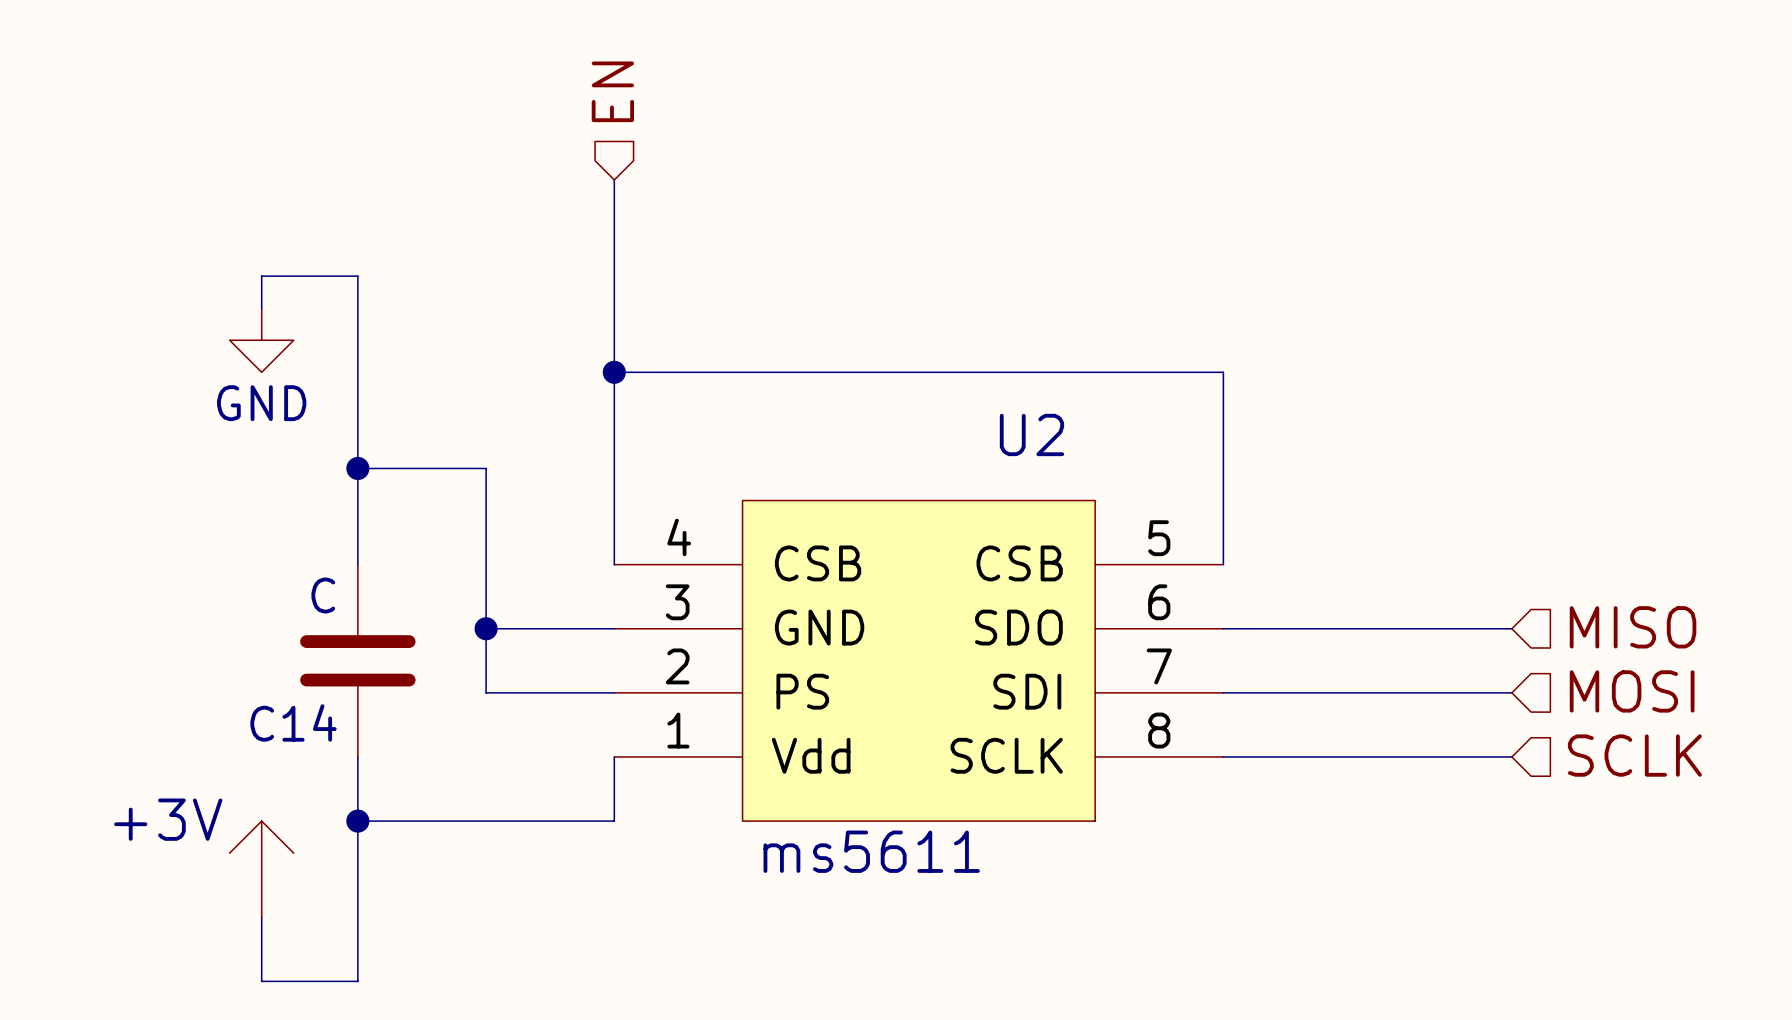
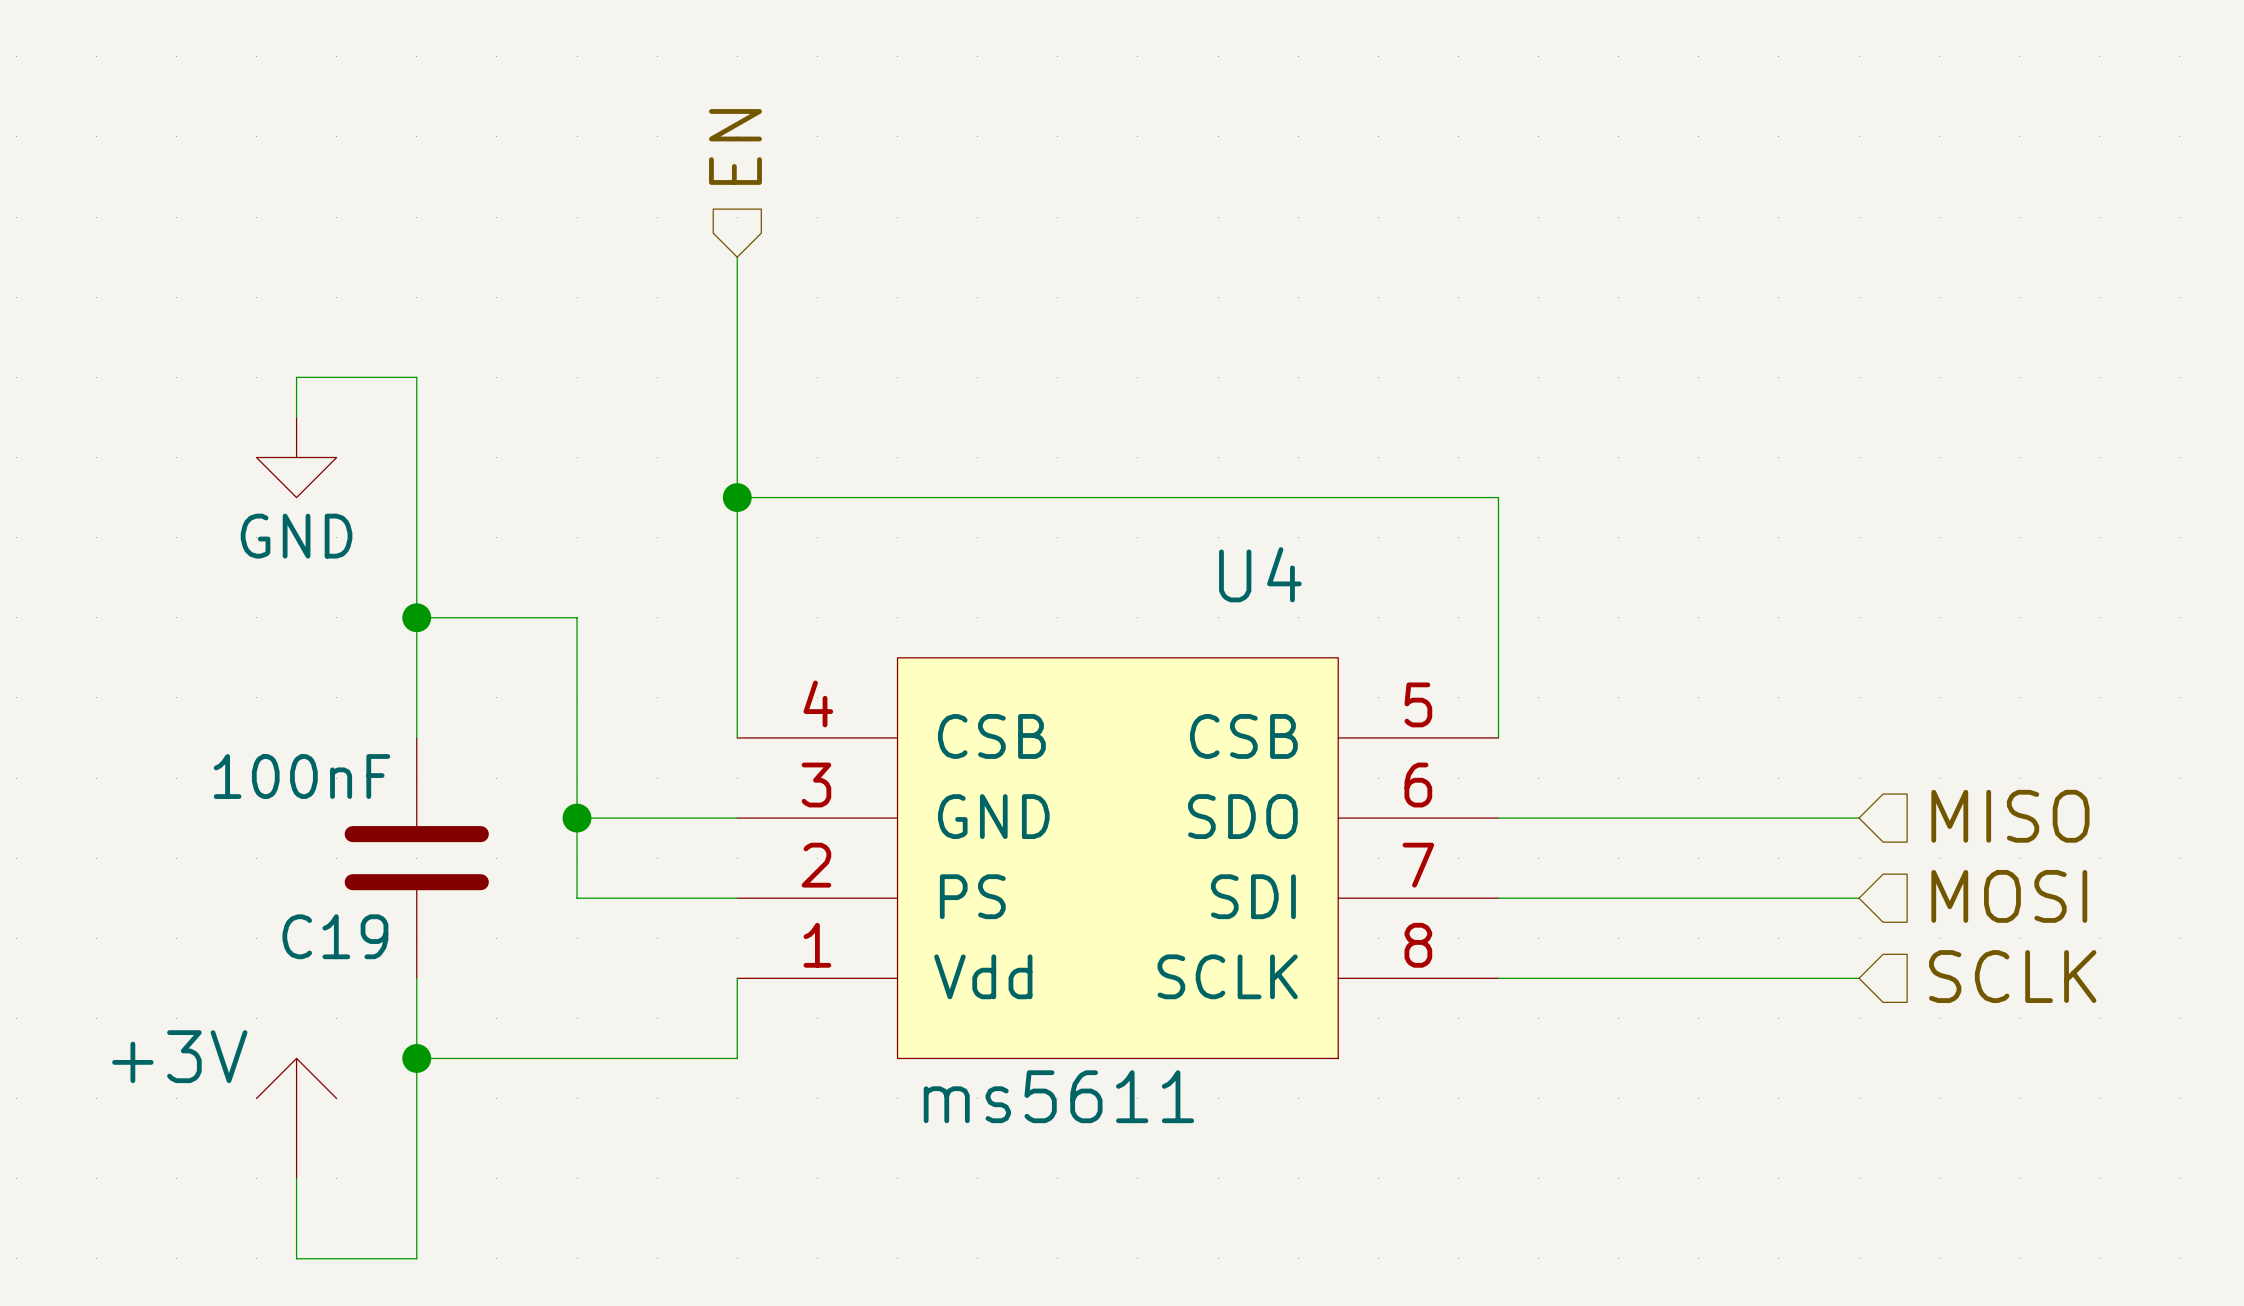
U2 name: U2 (1031, 434) -> U4 (1260, 574)
C14 value: C (323, 595) -> 100nF (301, 776)
C14 name: C14 (293, 722) -> C19 (335, 936)

